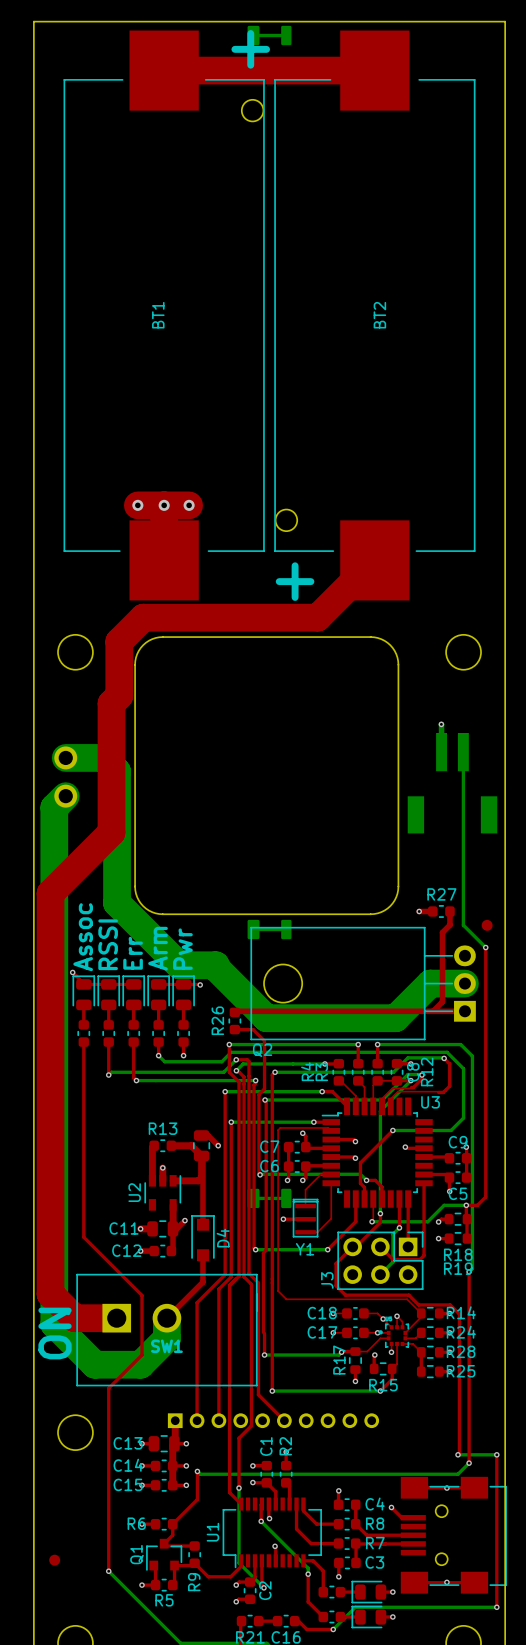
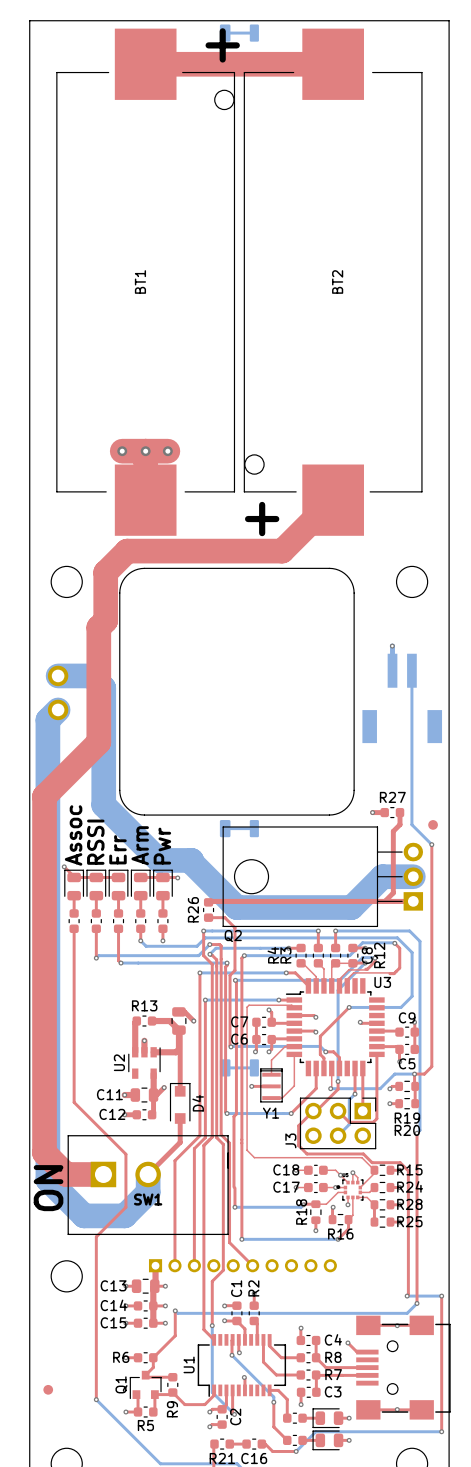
R18 name: R18 (458, 1254) -> R19 (407, 1118)
R19 name: R19 (458, 1268) -> R20 (407, 1130)
R14 name: R14 (461, 1312) -> R15 (409, 1169)
R17 name: R17 (339, 1360) -> R18 (301, 1211)
R15 name: R15 (383, 1385) -> R16 (340, 1234)

